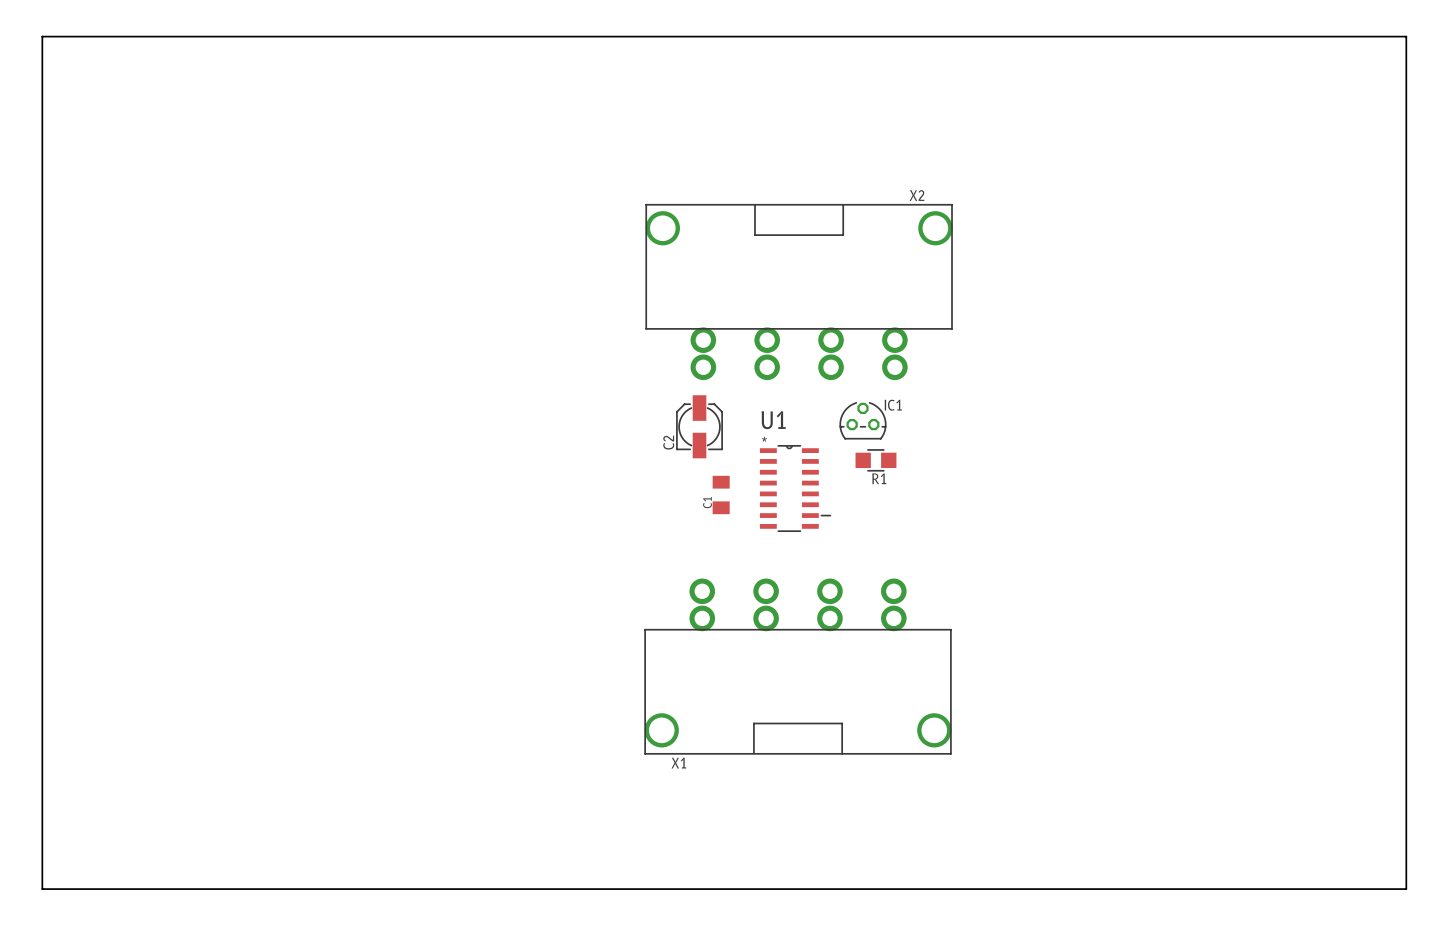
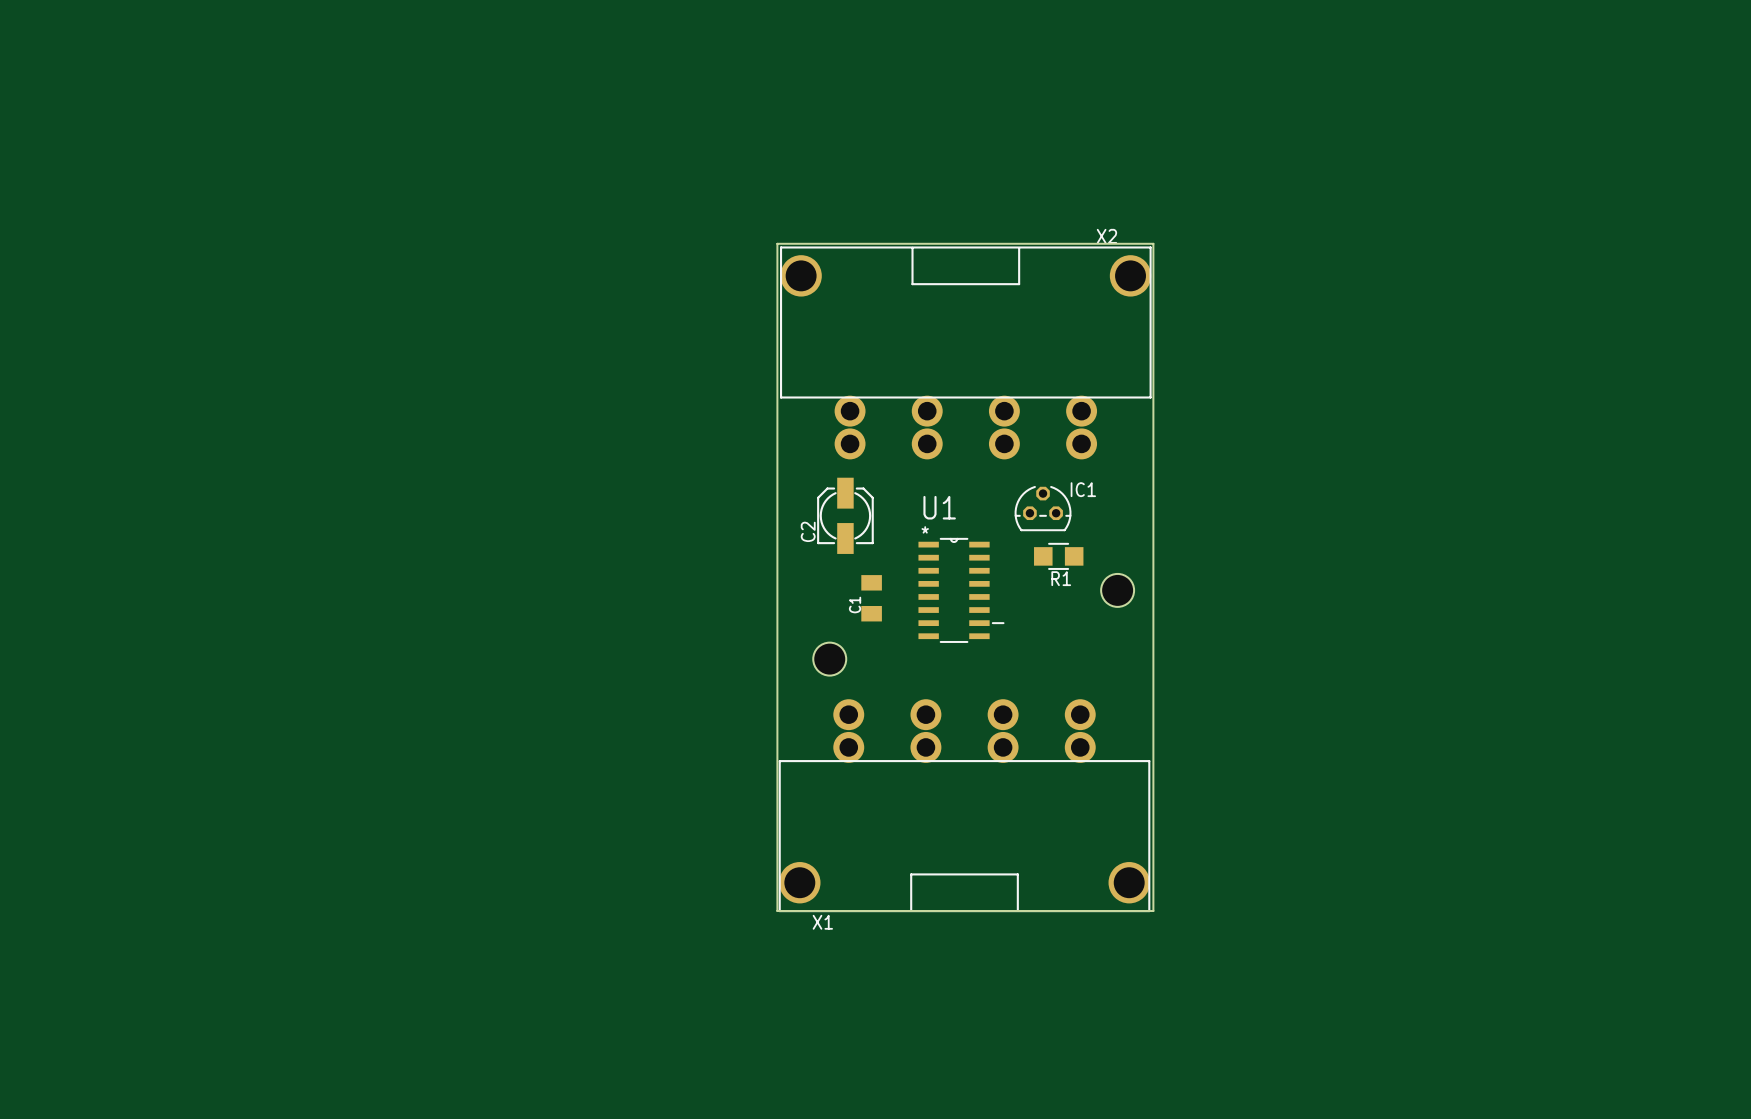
board edge: (42, 36) (1406, 36) (1406, 889) (42, 889) (42, 36) -> none
board edge: none -> (777, 243) (1153, 243) (1153, 911) (777, 911) (777, 243)
hole: none -> (1117, 590)
hole: none -> (829, 659)

